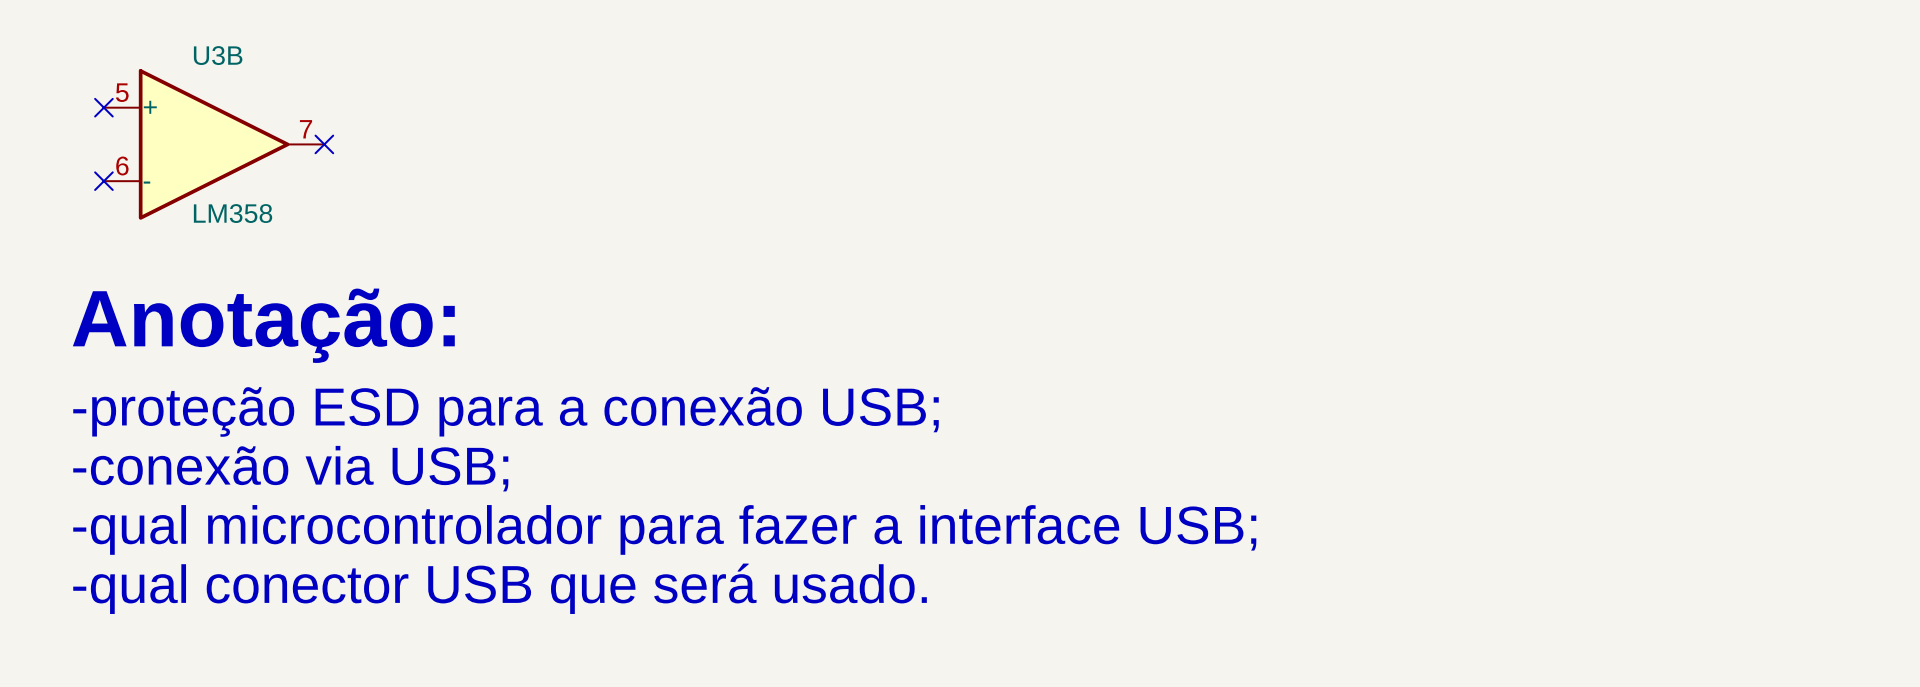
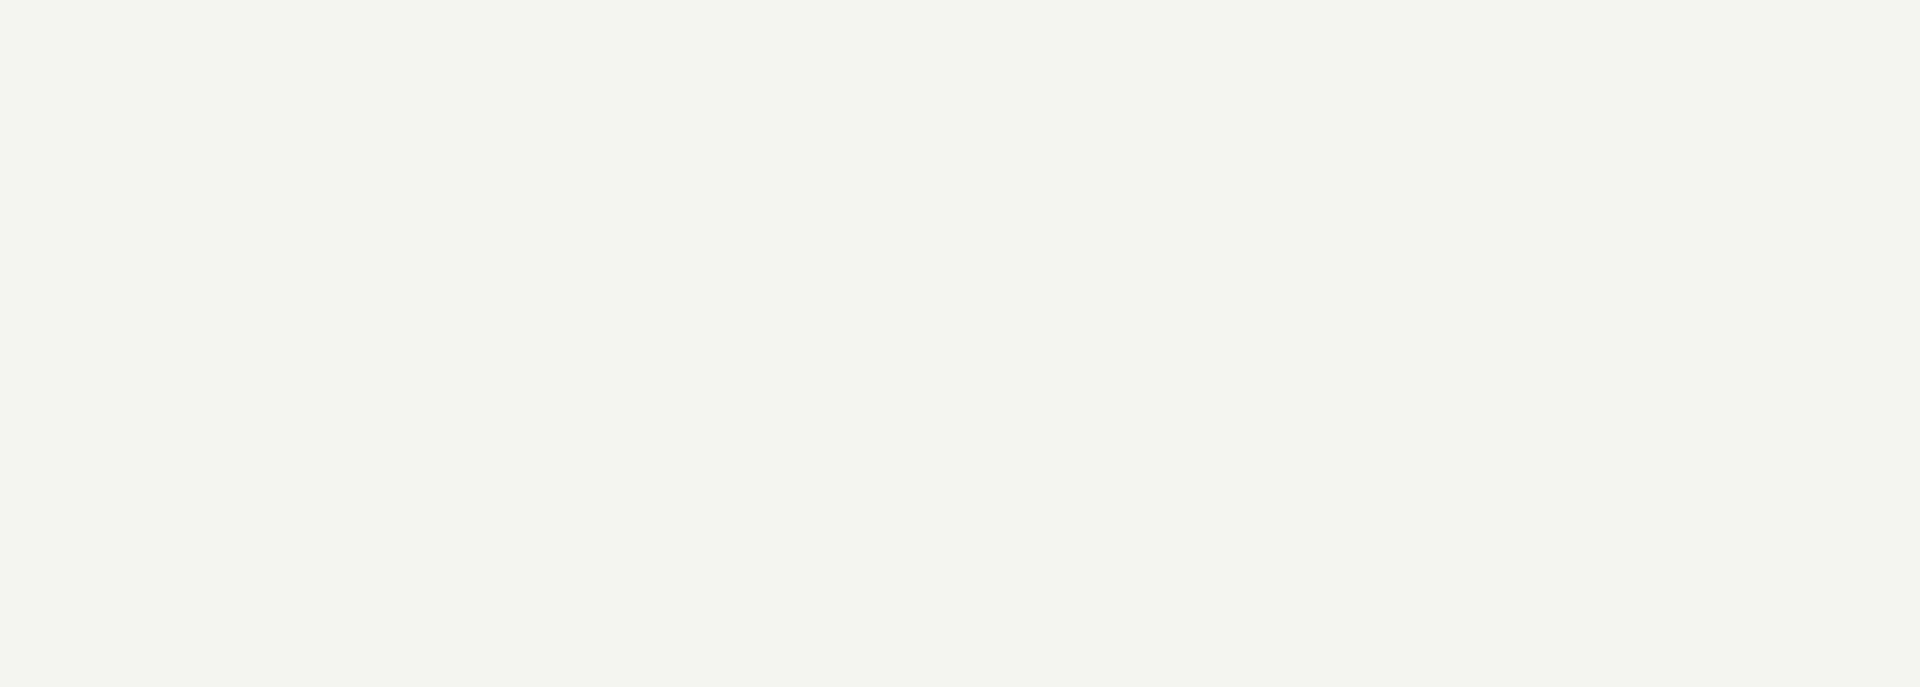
no-connect mark: (103, 107) -> none
U3B: LM358 (214, 144) -> none
no-connect mark: (324, 144) -> none
no-connect mark: (103, 181) -> none
text: Anotação: (263, 325) -> none
text: -proteção ESD para a conexão USB; (506, 411) -> none
text: -conexão via USB; (290, 468) -> none
text: -qual microcontrolador para fazer a interface USB; (664, 529) -> none
text: -qual conector USB que será usado. (500, 588) -> none

